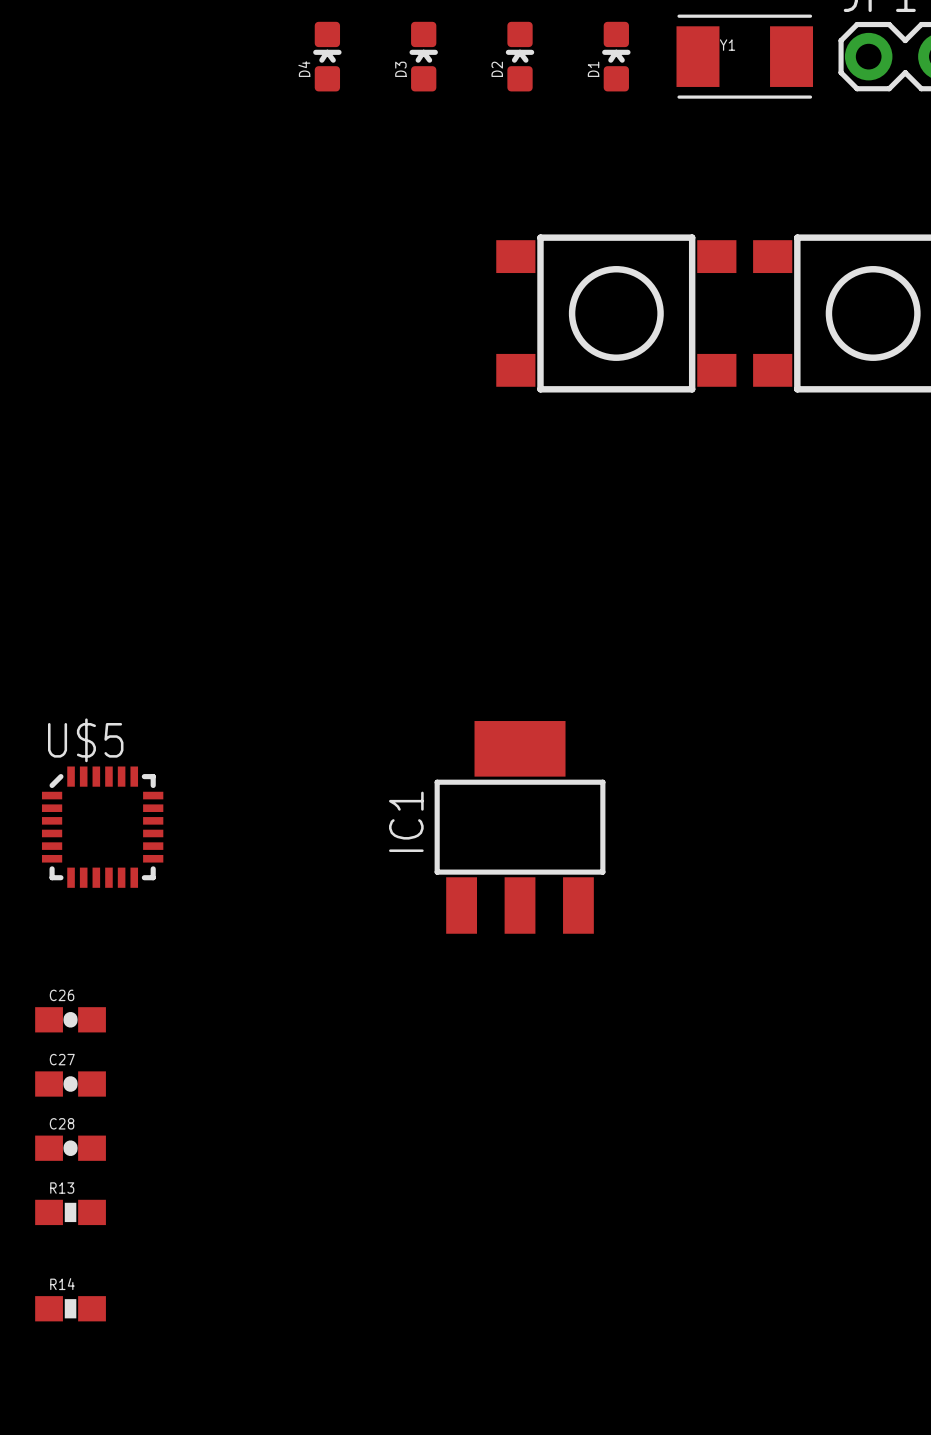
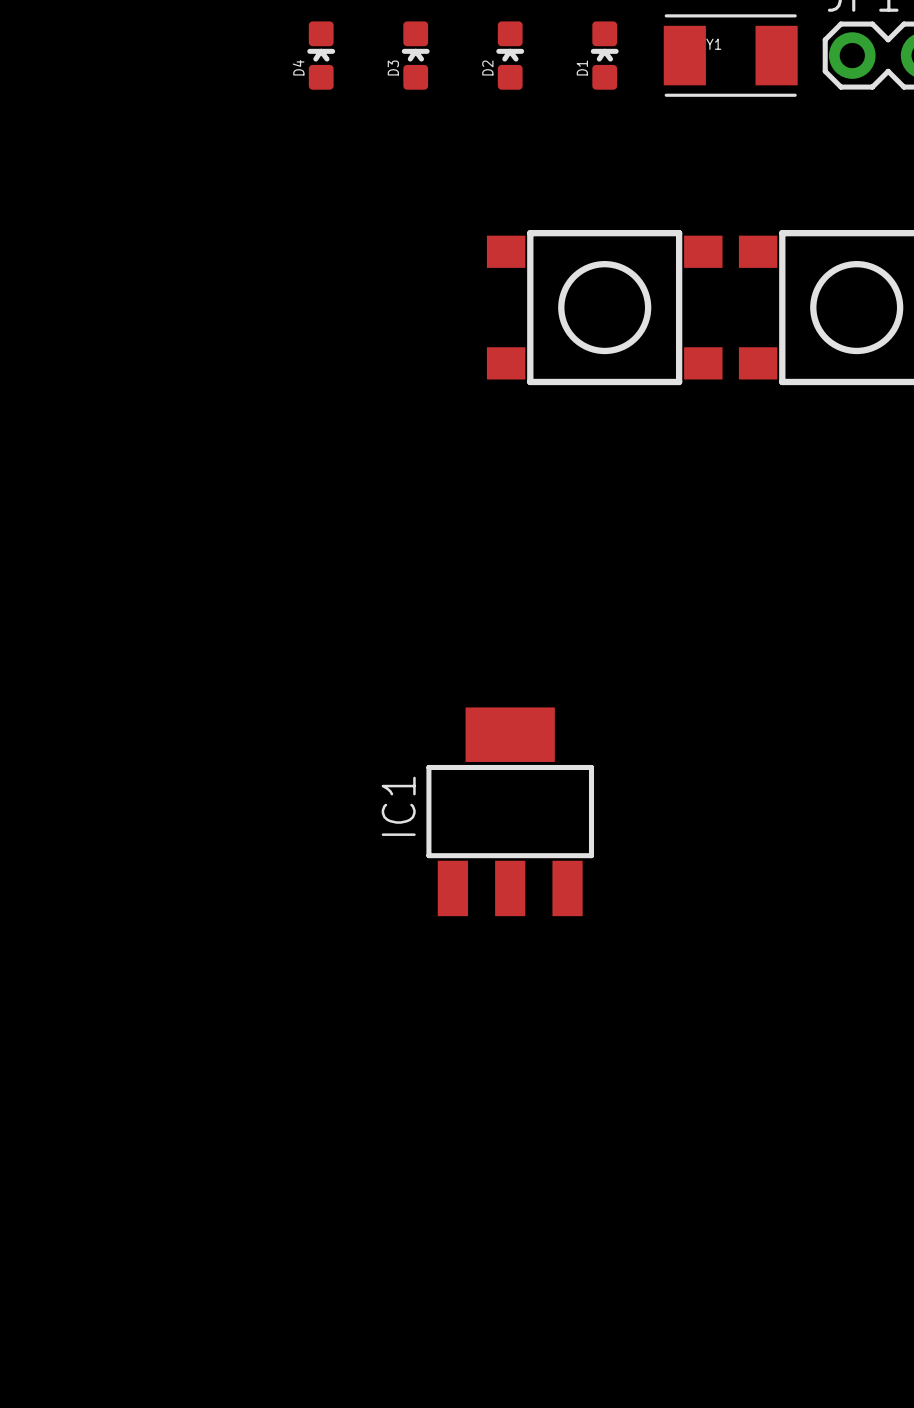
U$5: (102, 827) -> none
C26: (70, 1019) -> none
C27: (70, 1084) -> none
C28: (70, 1148) -> none
R13: (70, 1212) -> none
R14: (70, 1308) -> none

